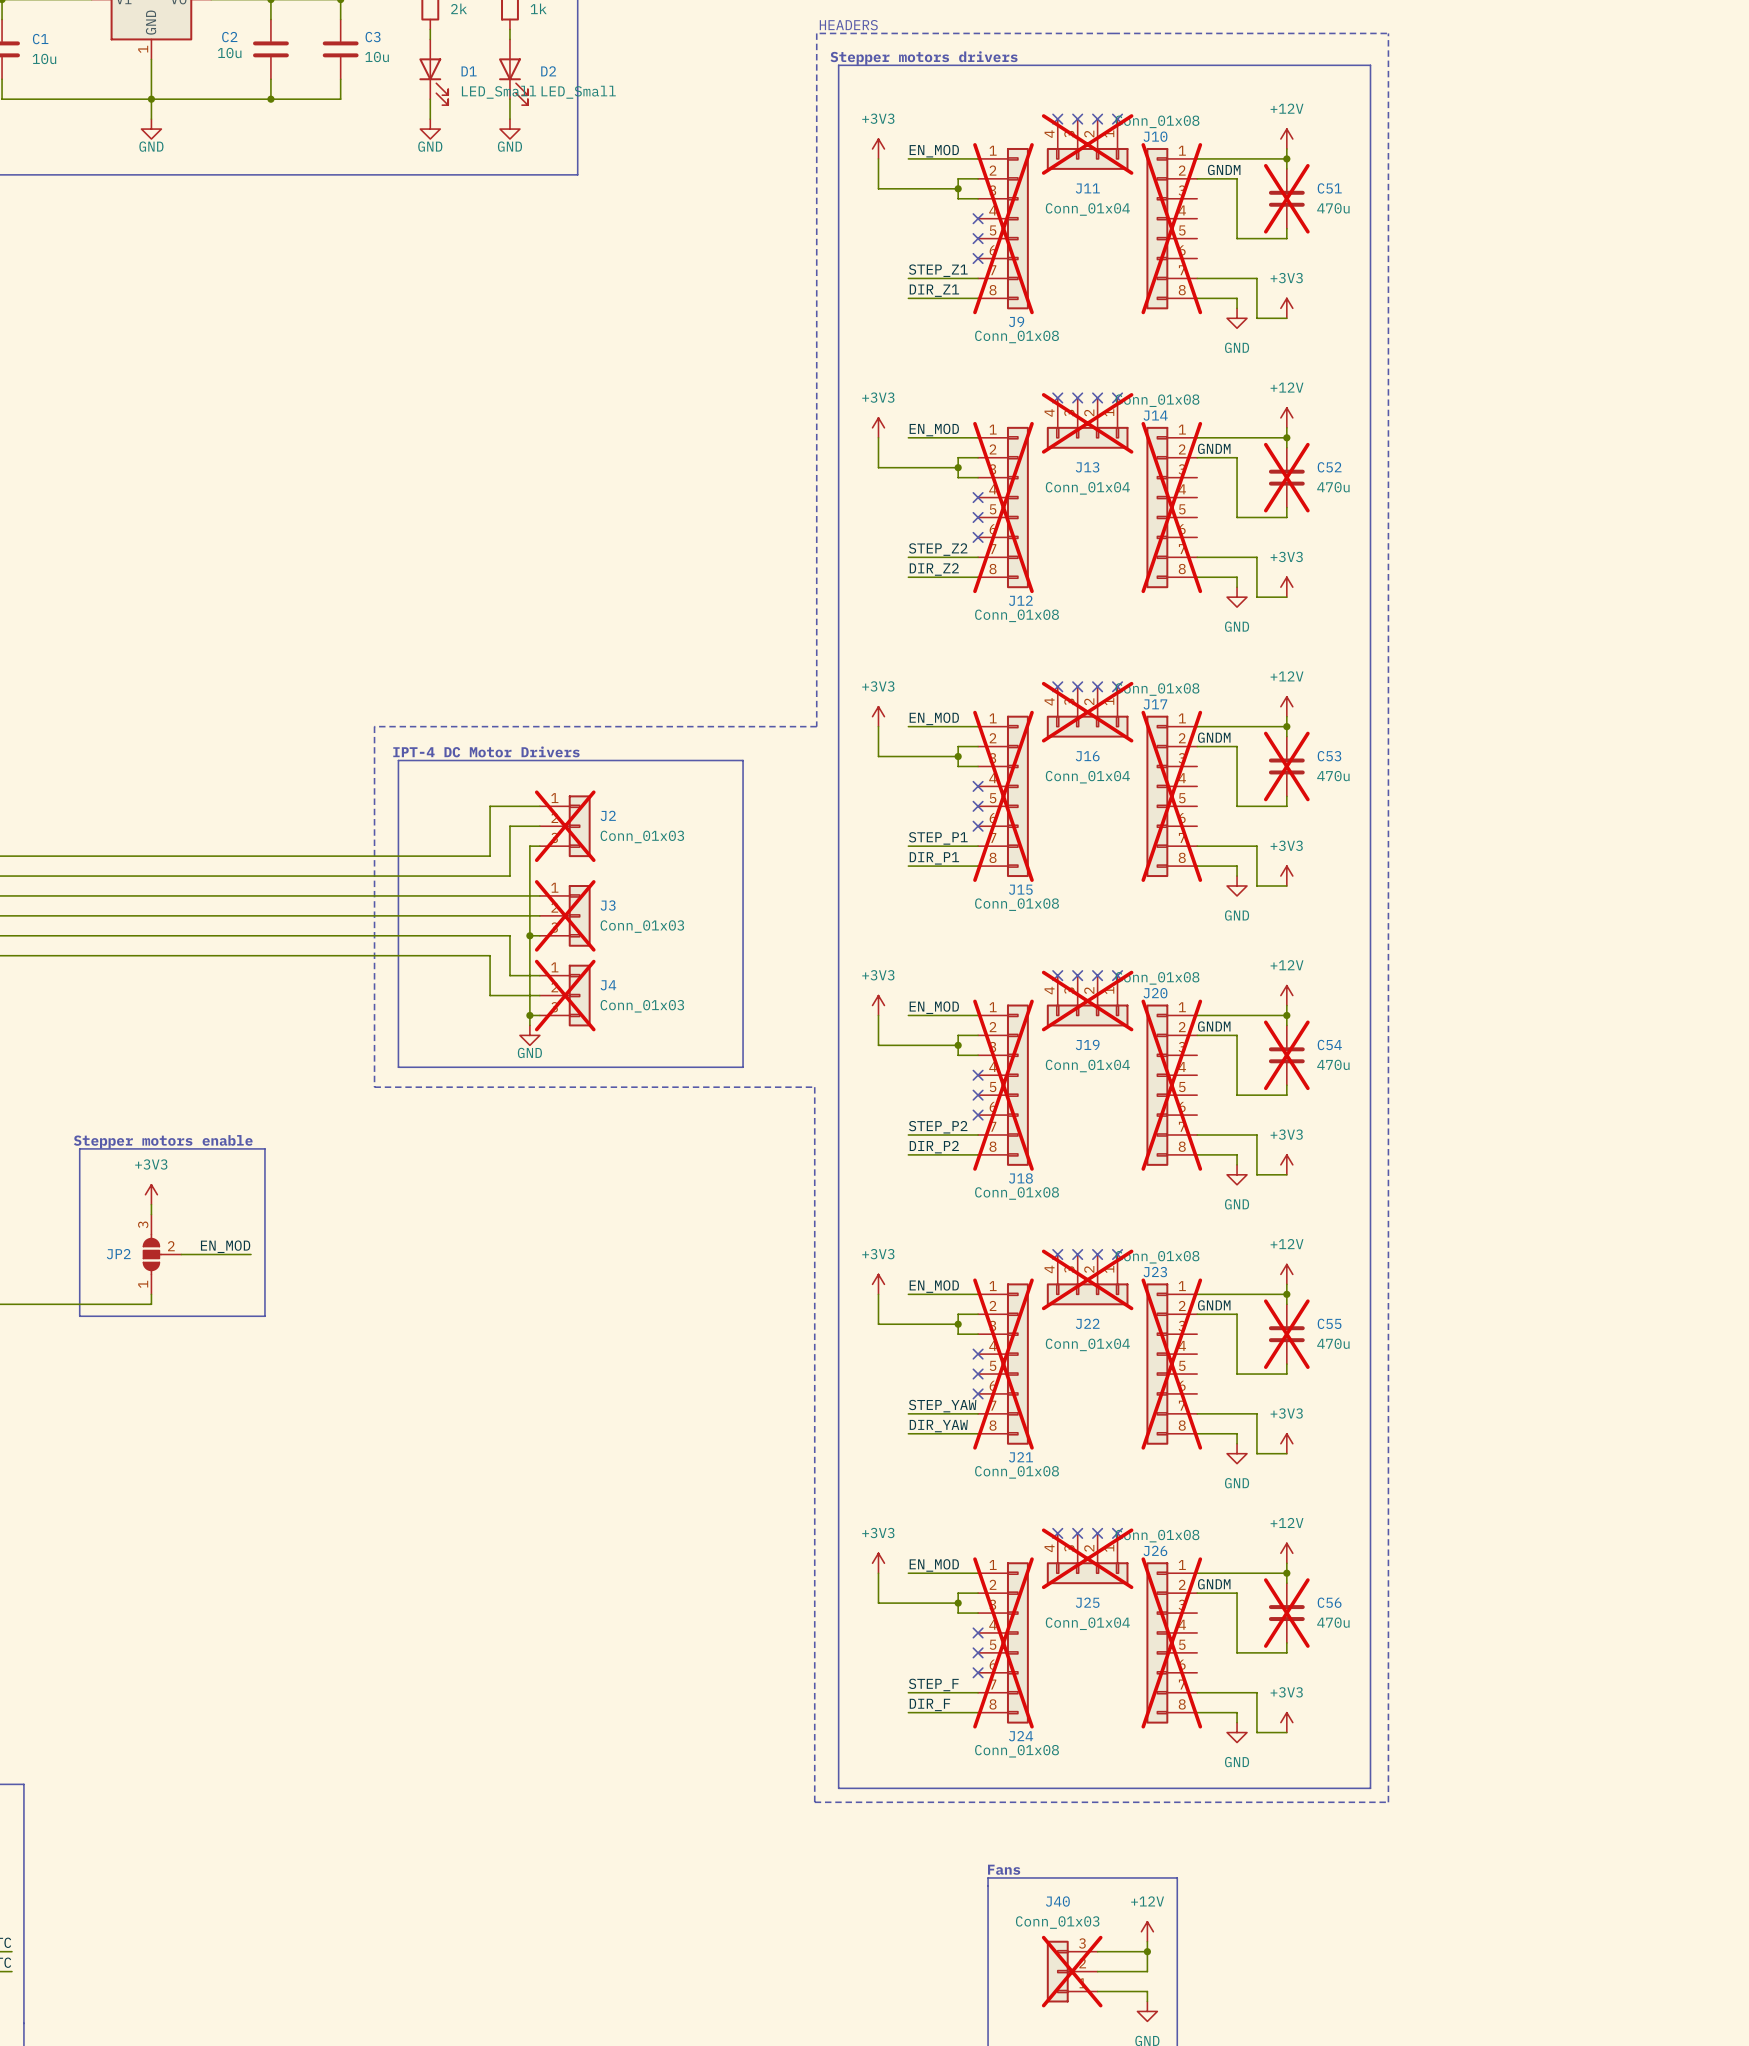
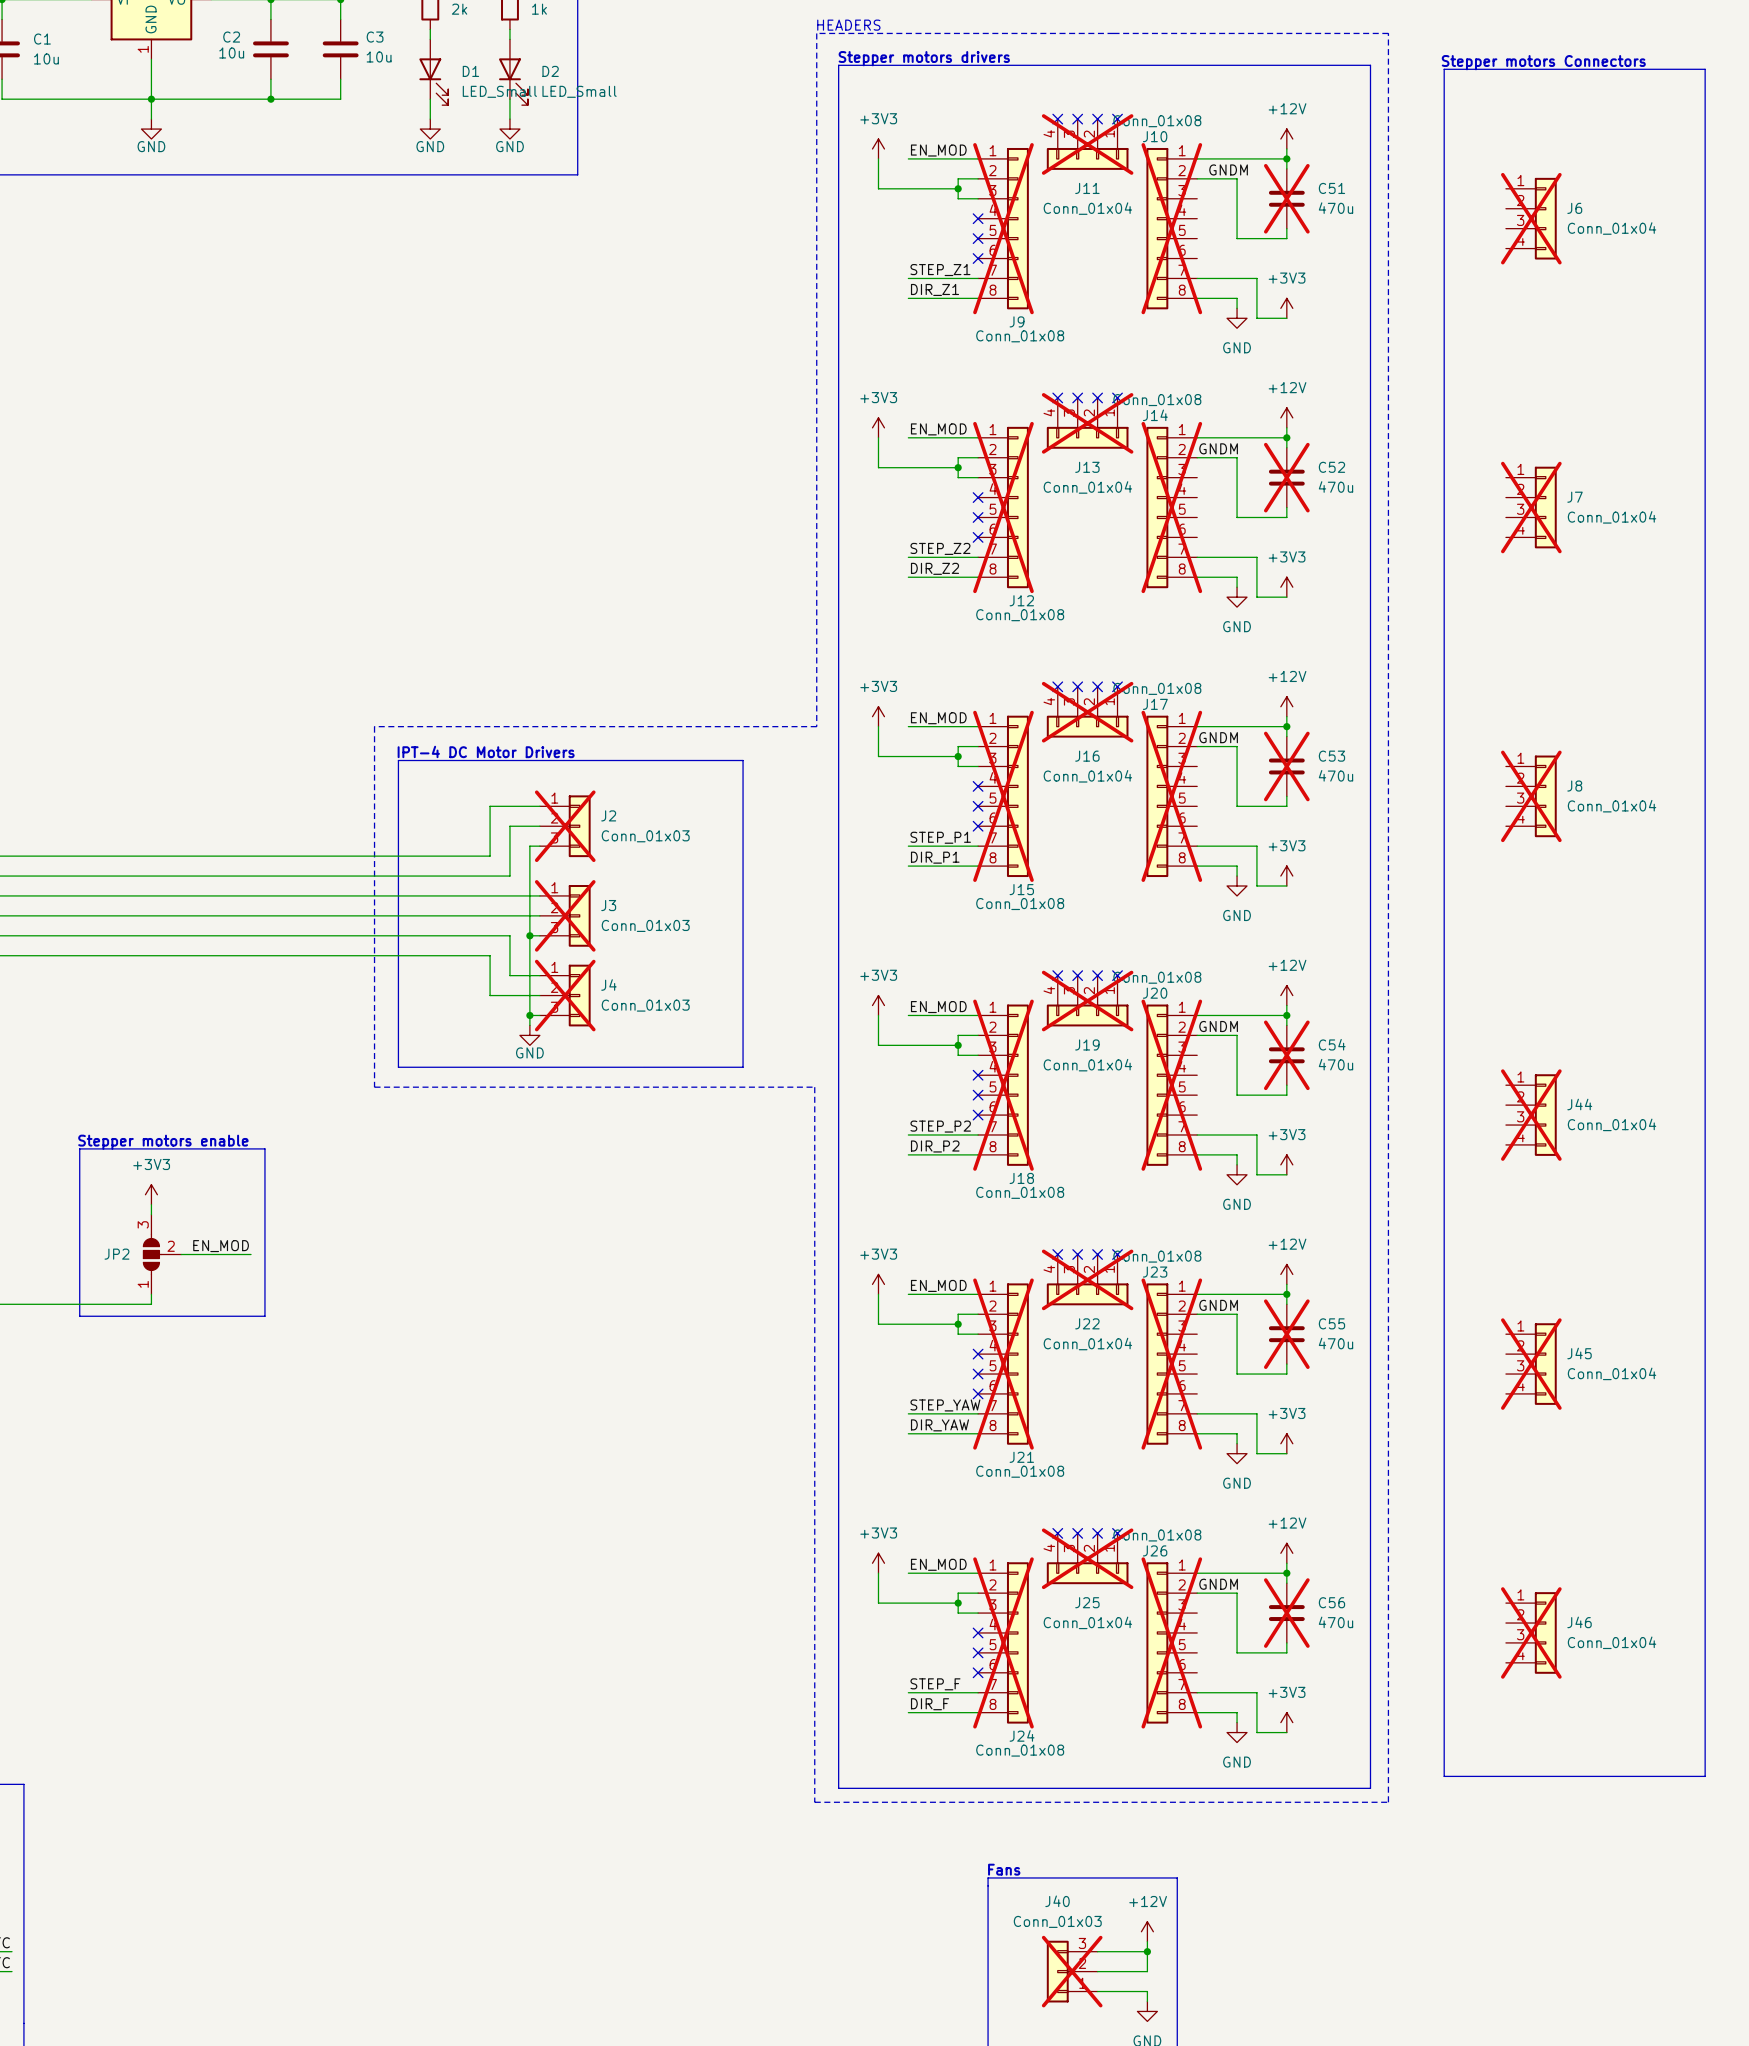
text: none -> Stepper motors Connectors (1543, 62)
line: none -> (1444, 69) (1444, 1776) (1705, 1776) (1705, 69) (1444, 69)
J6: none -> Conn_01x04 (1531, 218)
J7: none -> Conn_01x04 (1531, 507)
J8: none -> Conn_01x04 (1531, 796)
J44: none -> Conn_01x04 (1531, 1115)
J45: none -> Conn_01x04 (1531, 1364)
J46: none -> Conn_01x04 (1531, 1632)

